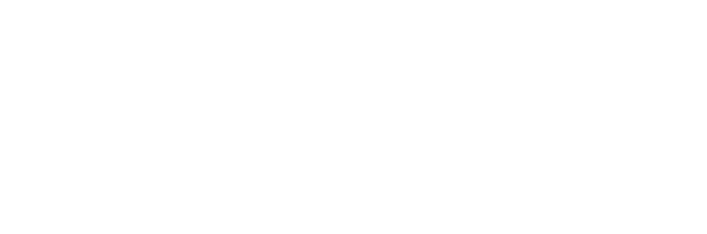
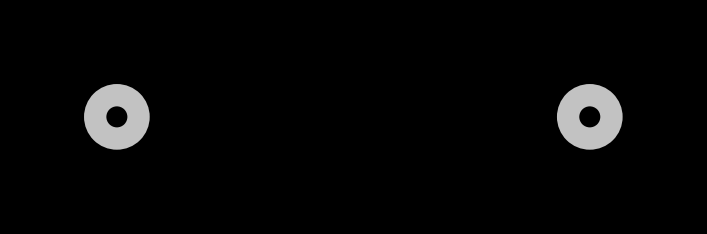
via: none -> (116, 116)
via: none -> (589, 116)

